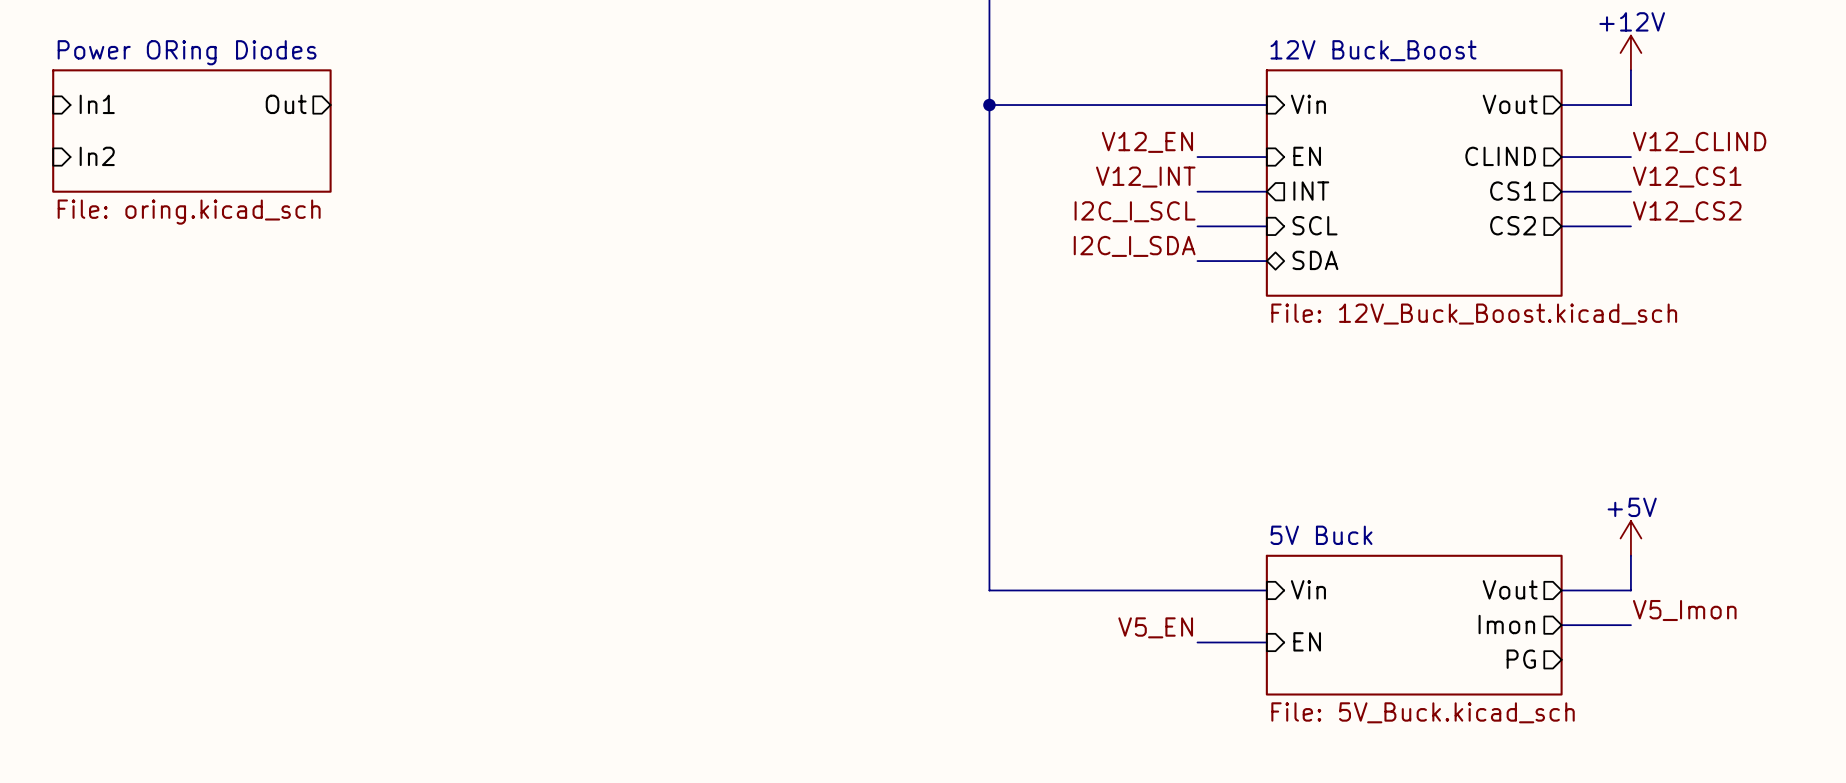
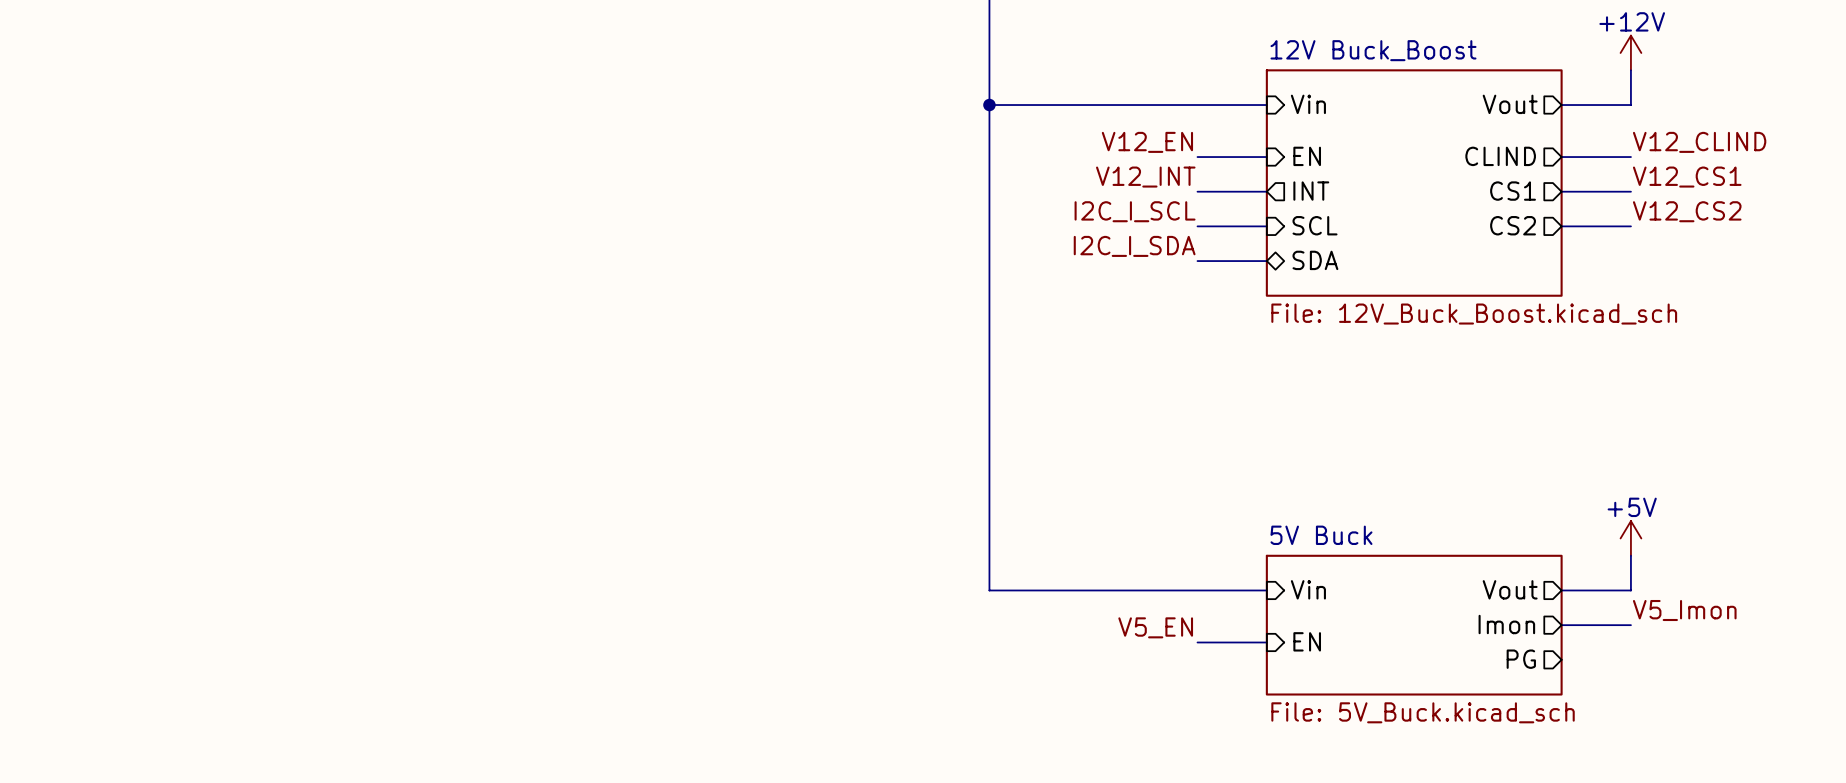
sheet pin: In1 (97, 104) -> none
sheet pin: Out (286, 104) -> none
sheet Power ORing Diodes: File: oring.kicad_sch (191, 131) -> none
sheet pin: In2 (97, 156) -> none

